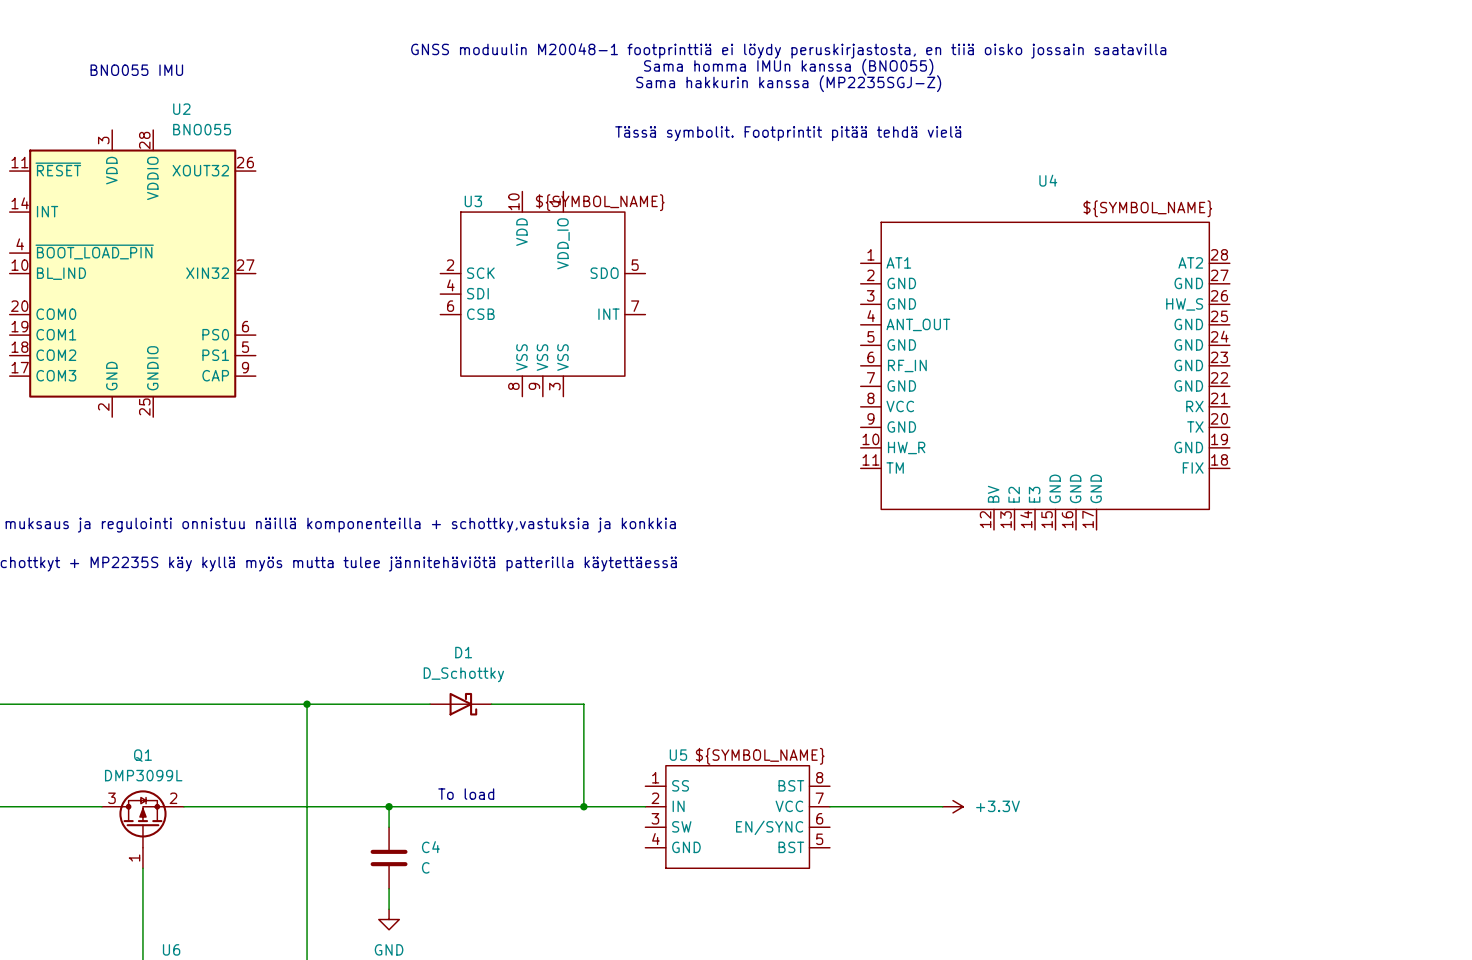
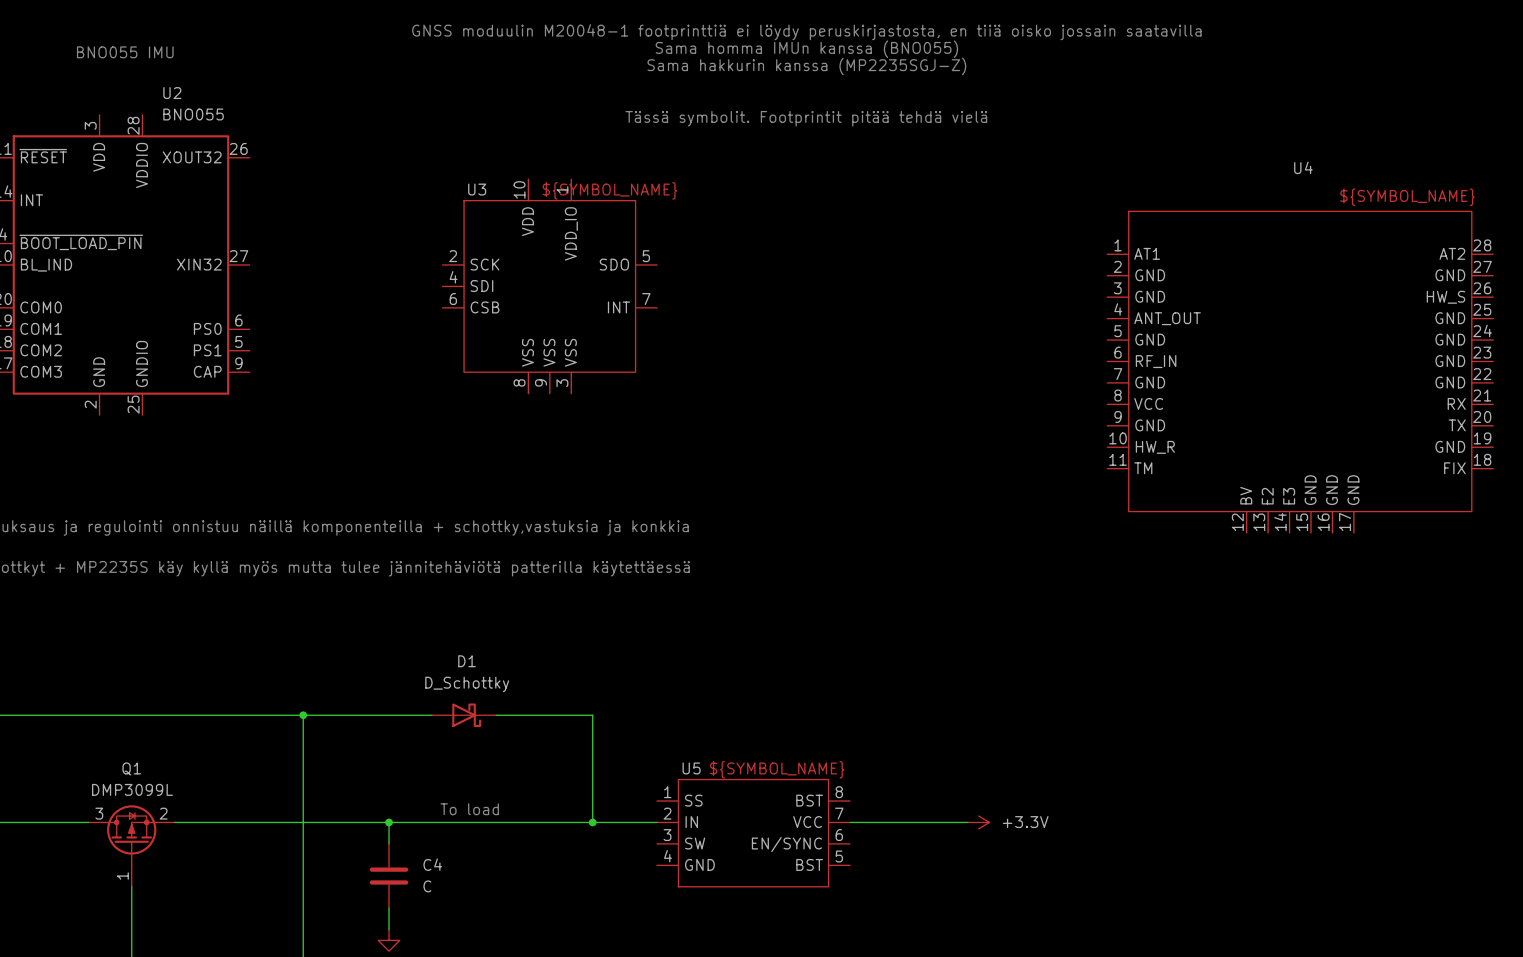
U4 position: (1045, 376) -> (1300, 372)

